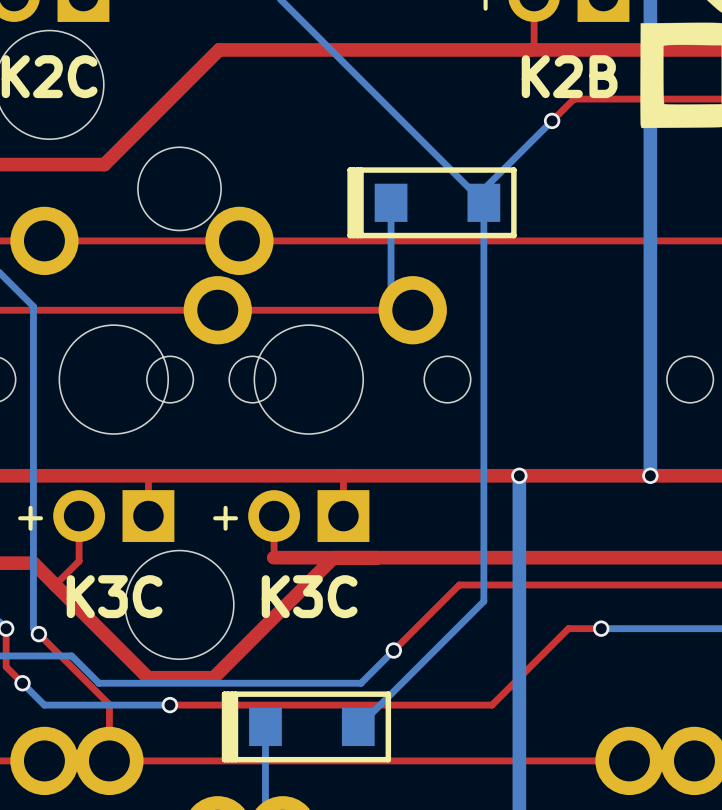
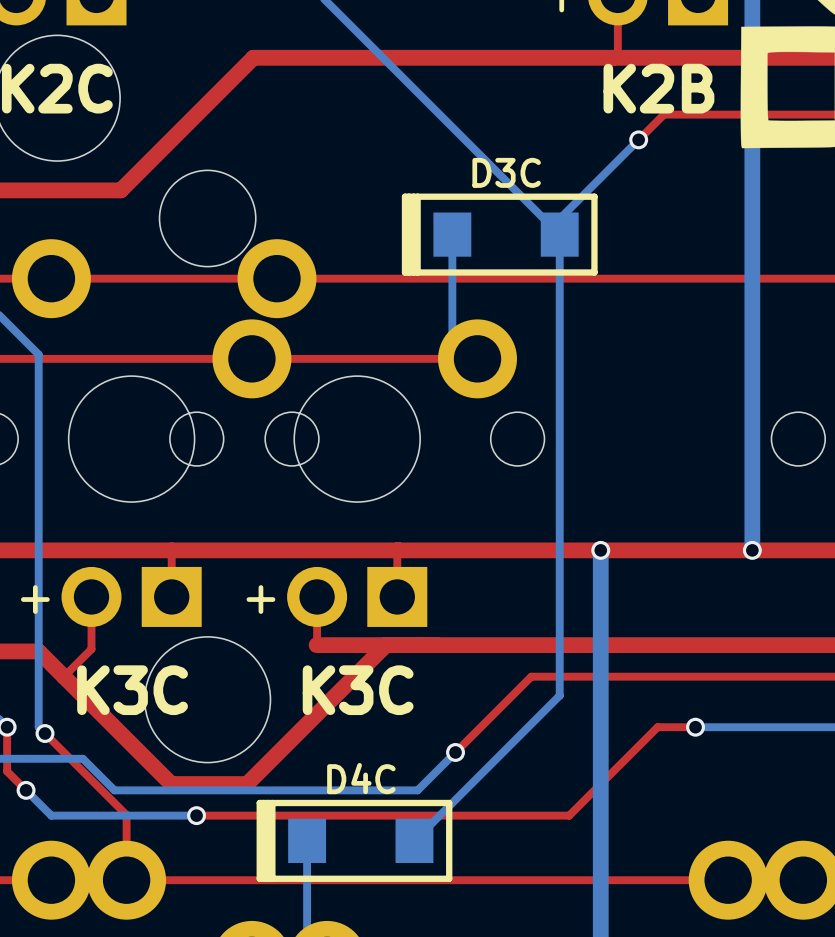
part value: none -> D3C (506, 172)
part value: none -> D4C (361, 778)

